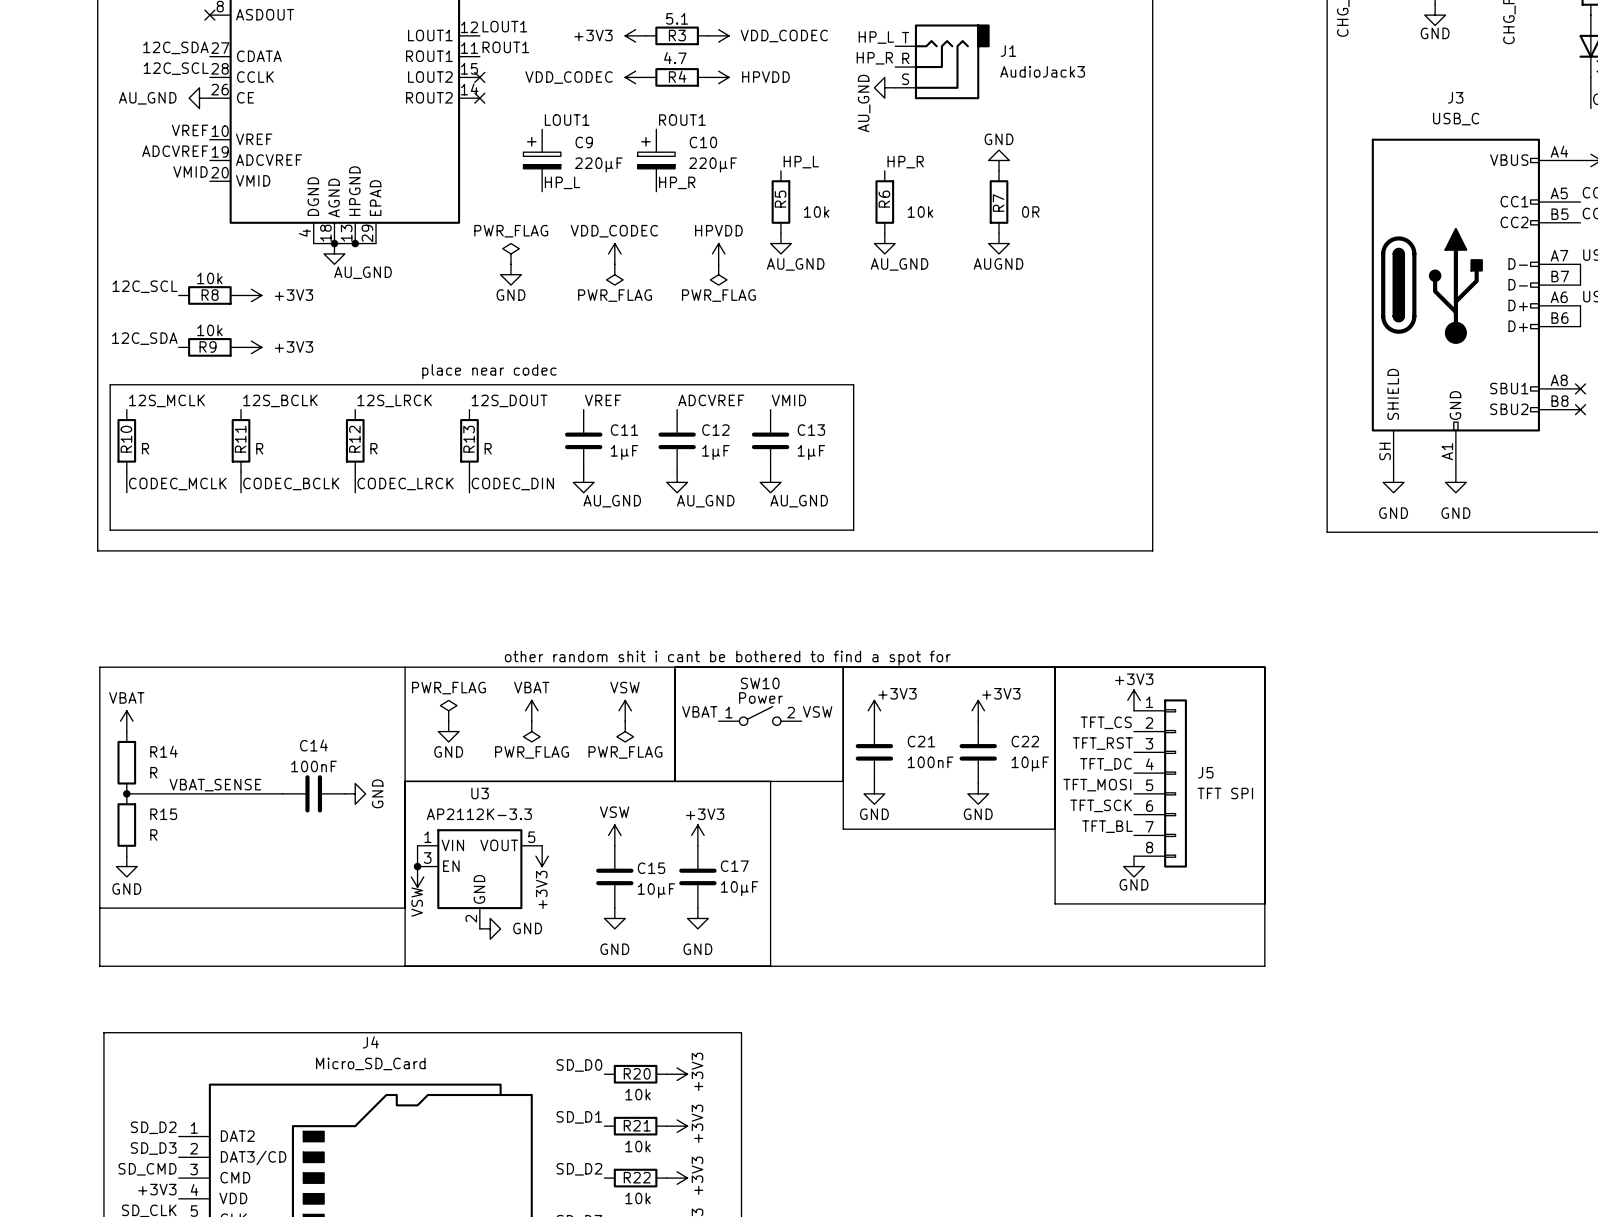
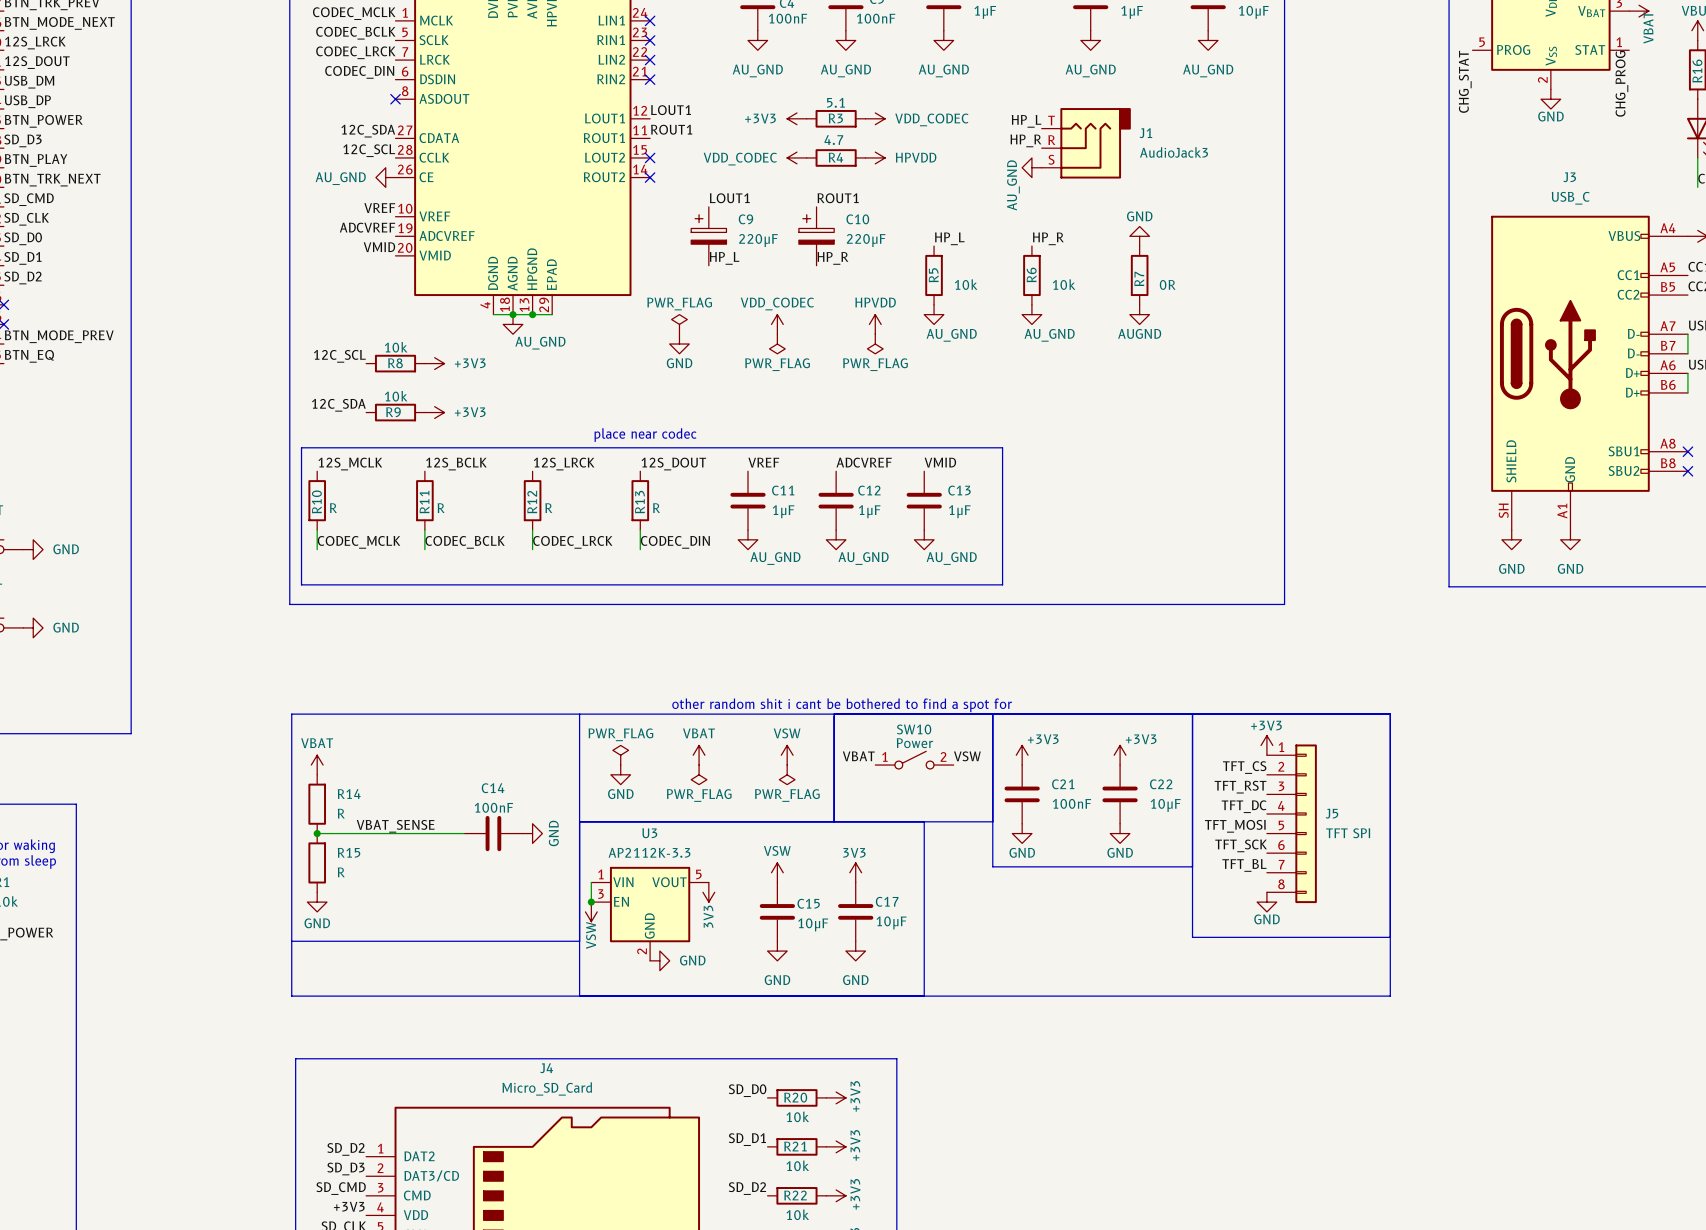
power symbol: +3V3 (697, 835) -> 3V3 (855, 872)
power symbol: +3V3 (542, 856) -> 3V3 (708, 892)

